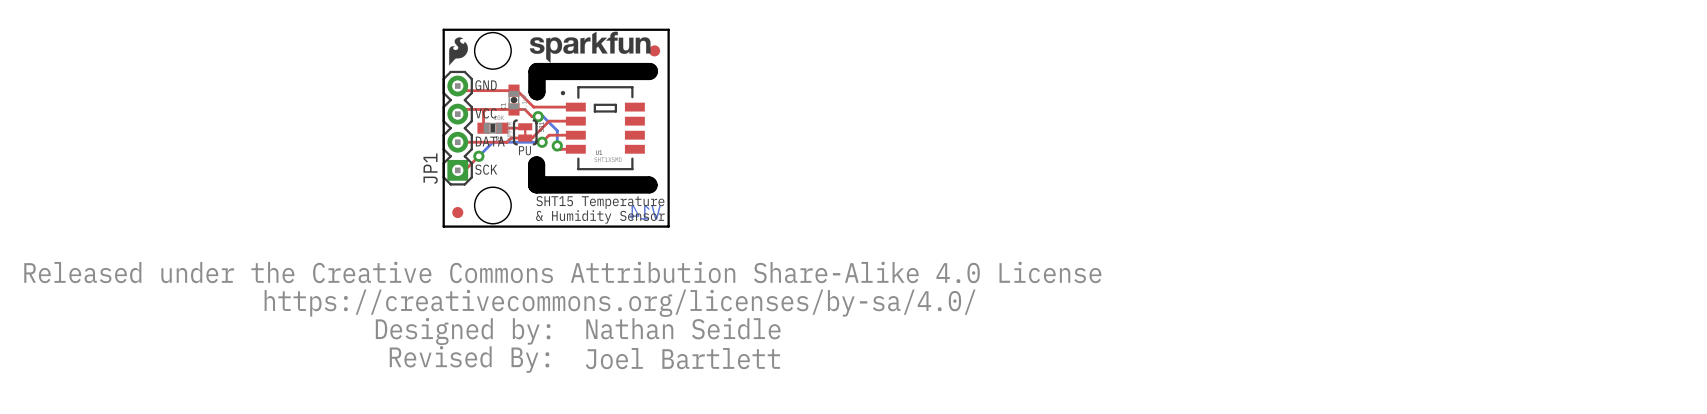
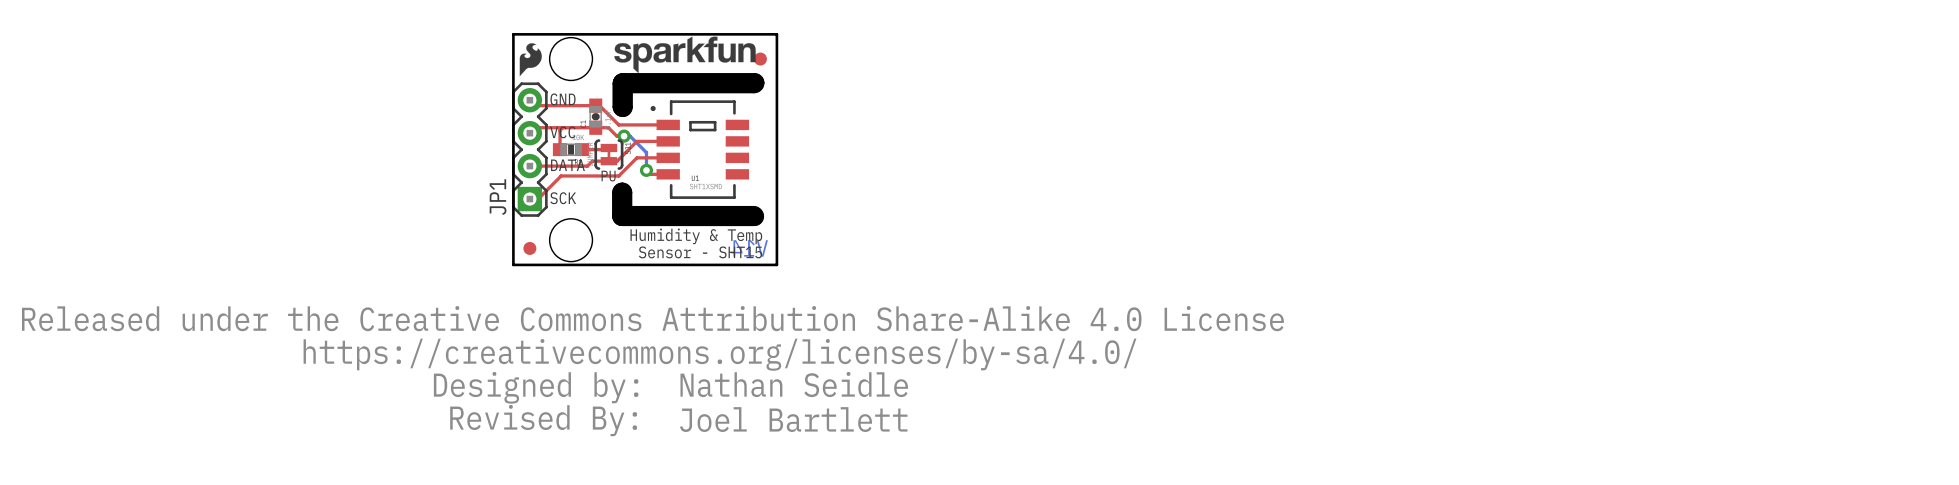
top track: none -> (628, 166) (618, 175) (561, 175) (554, 182)
bottom track: (542, 142) (492, 142) (478, 156) -> none
via: (542, 142) -> none
via: (478, 156) -> none
text: SHT15 Temperature (600, 202) -> none
text: none -> Sensor - SHT15 (700, 252)
text: & Humidity Sensor (600, 216) -> Humidity & Temp (696, 236)

